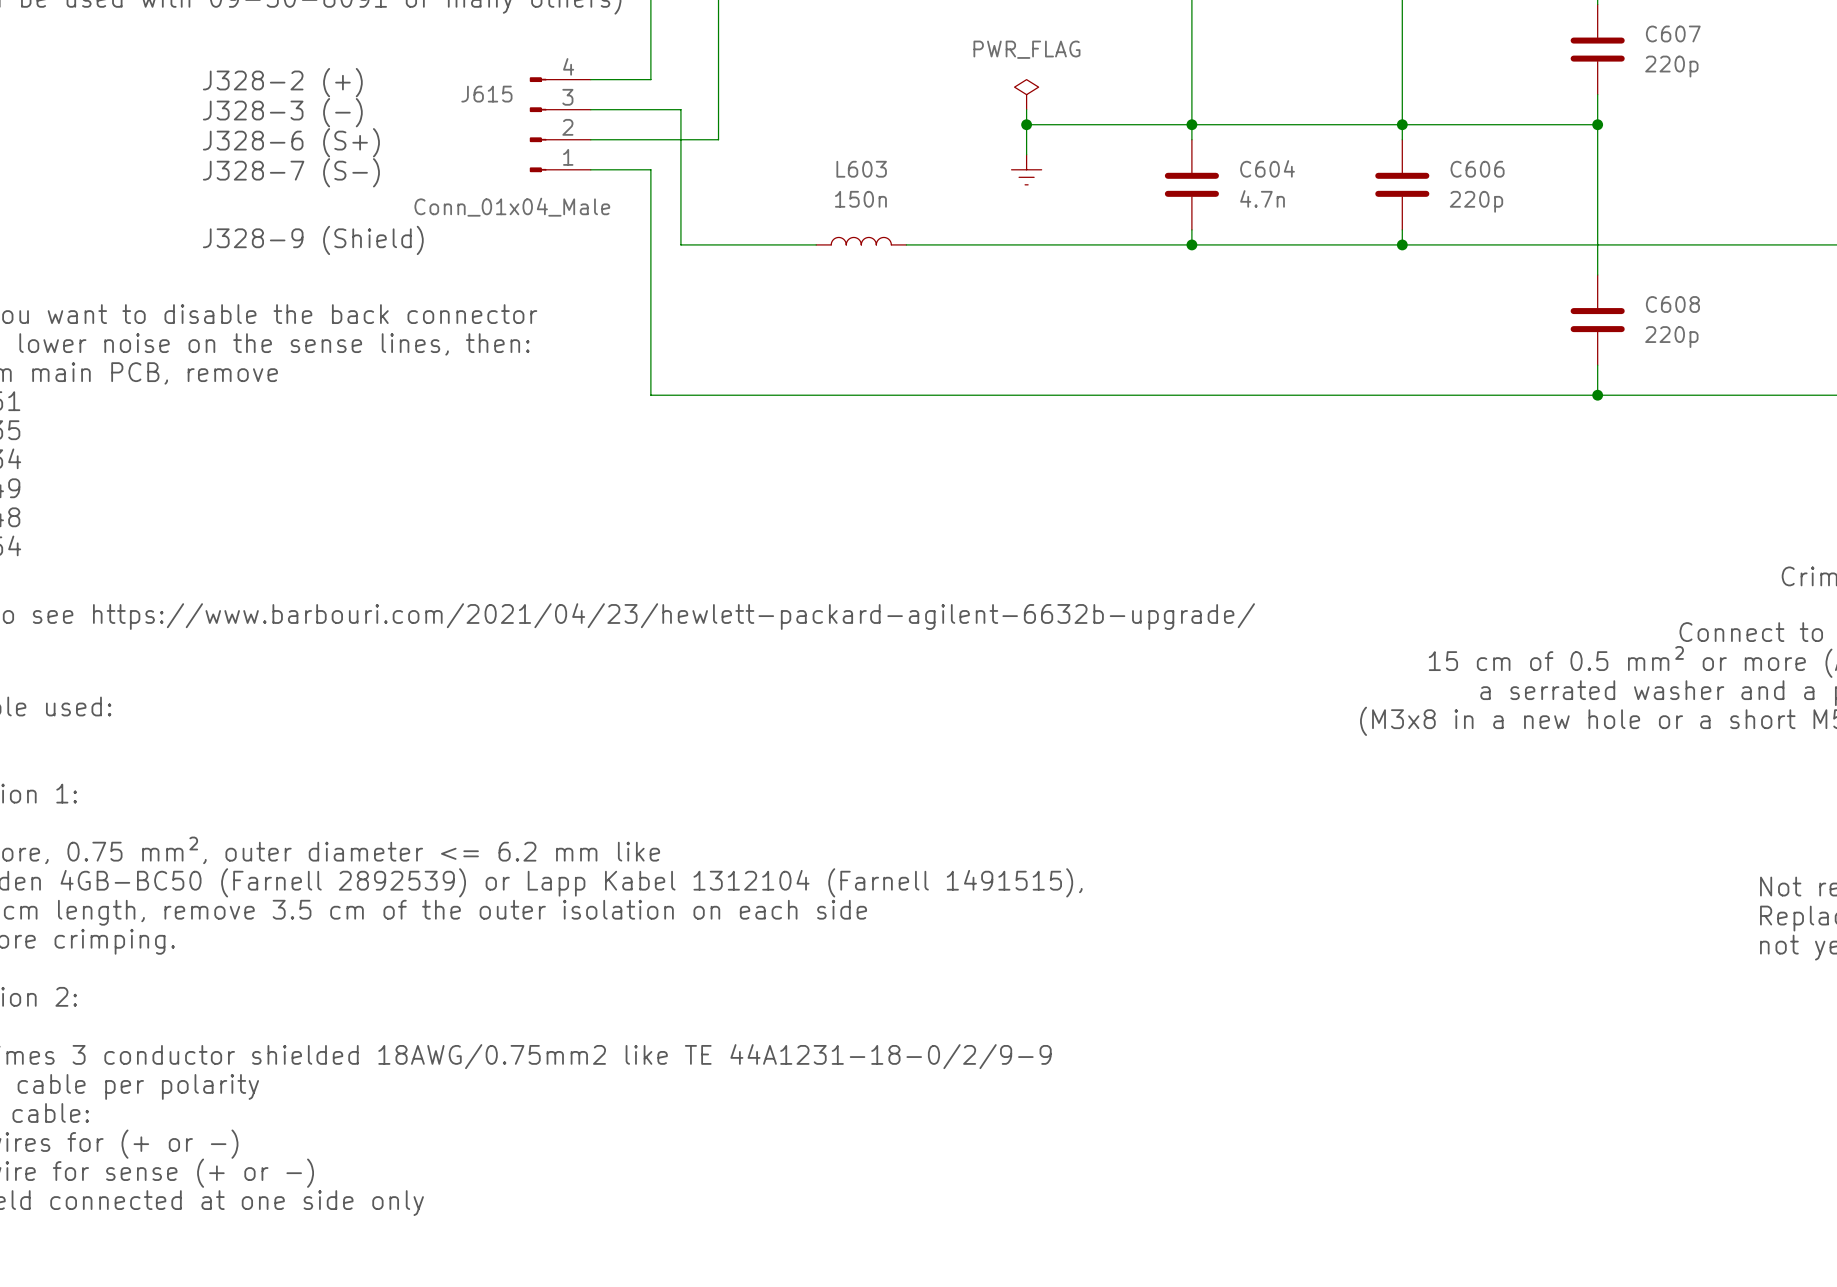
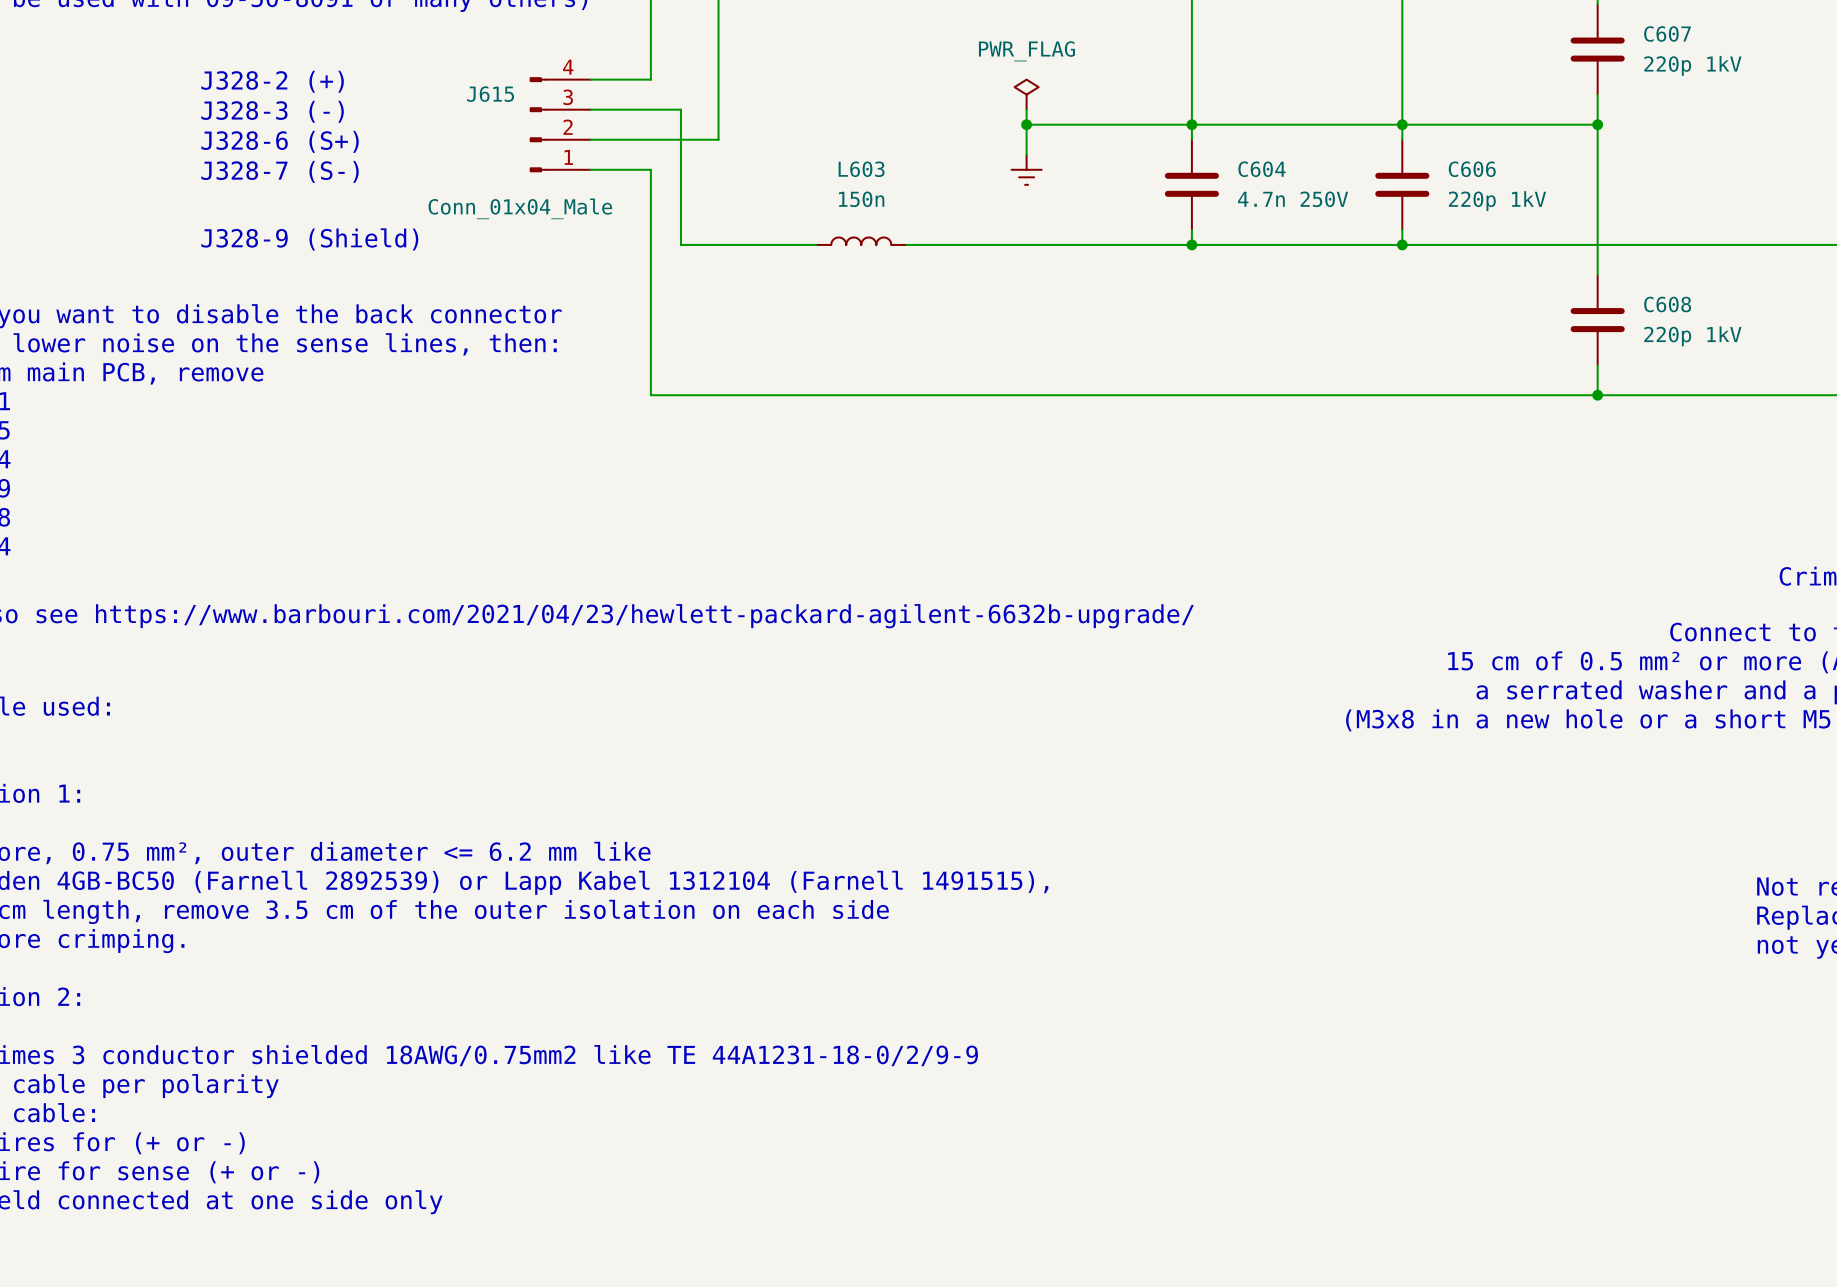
C607 value: 220p (1671, 66) -> 220p 1kV (1692, 65)
C604 value: 4.7n (1262, 198) -> 4.7n 250V (1293, 199)
C606 value: 220p (1476, 201) -> 220p 1kV (1497, 201)
C608 value: 220p (1671, 337) -> 220p 1kV (1692, 336)

